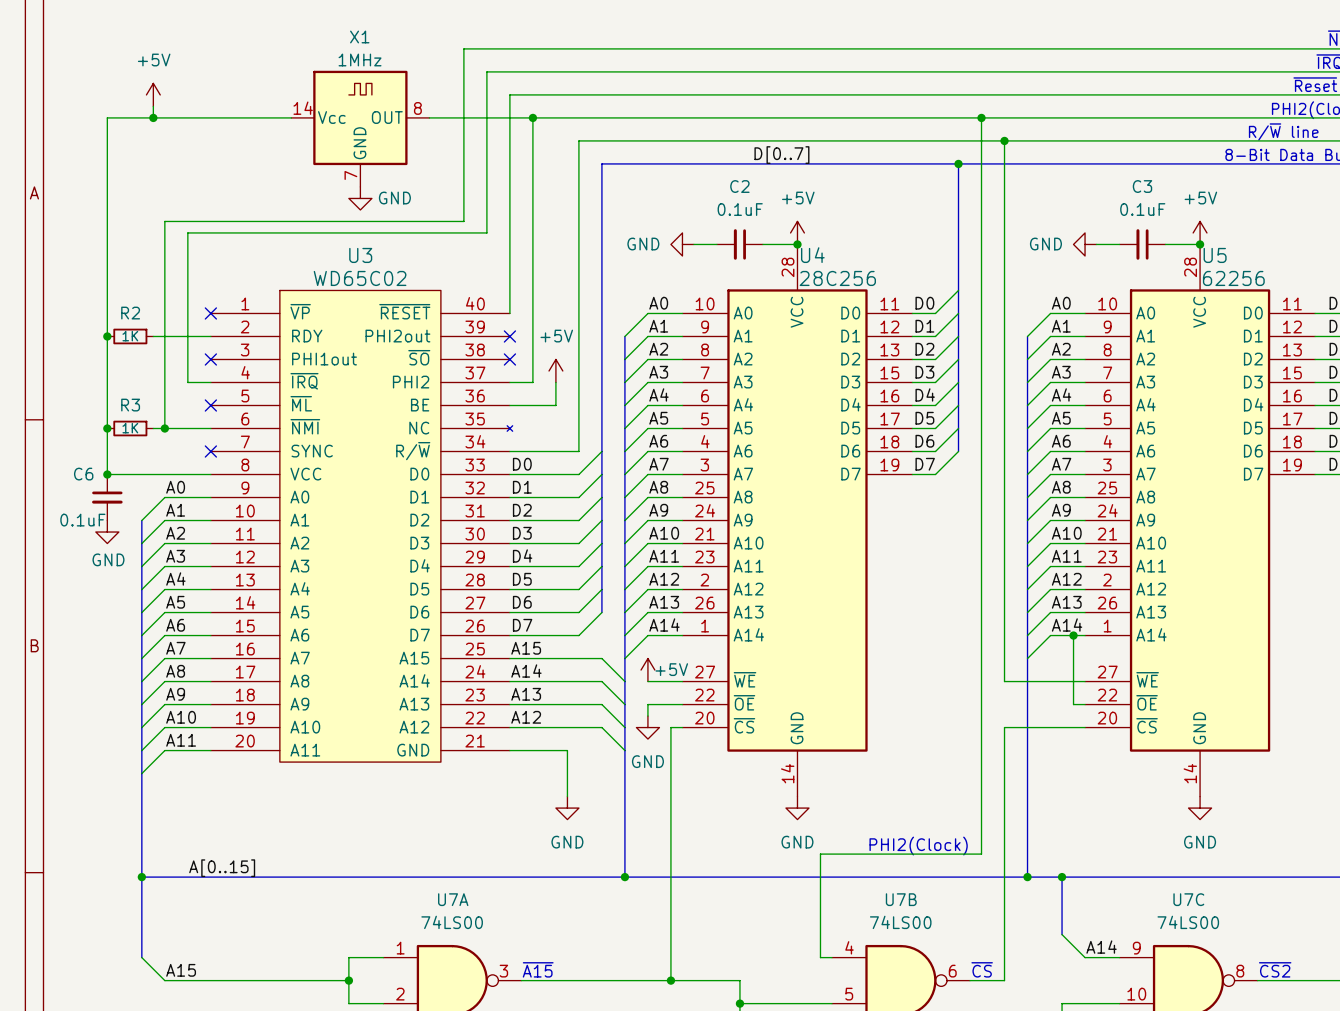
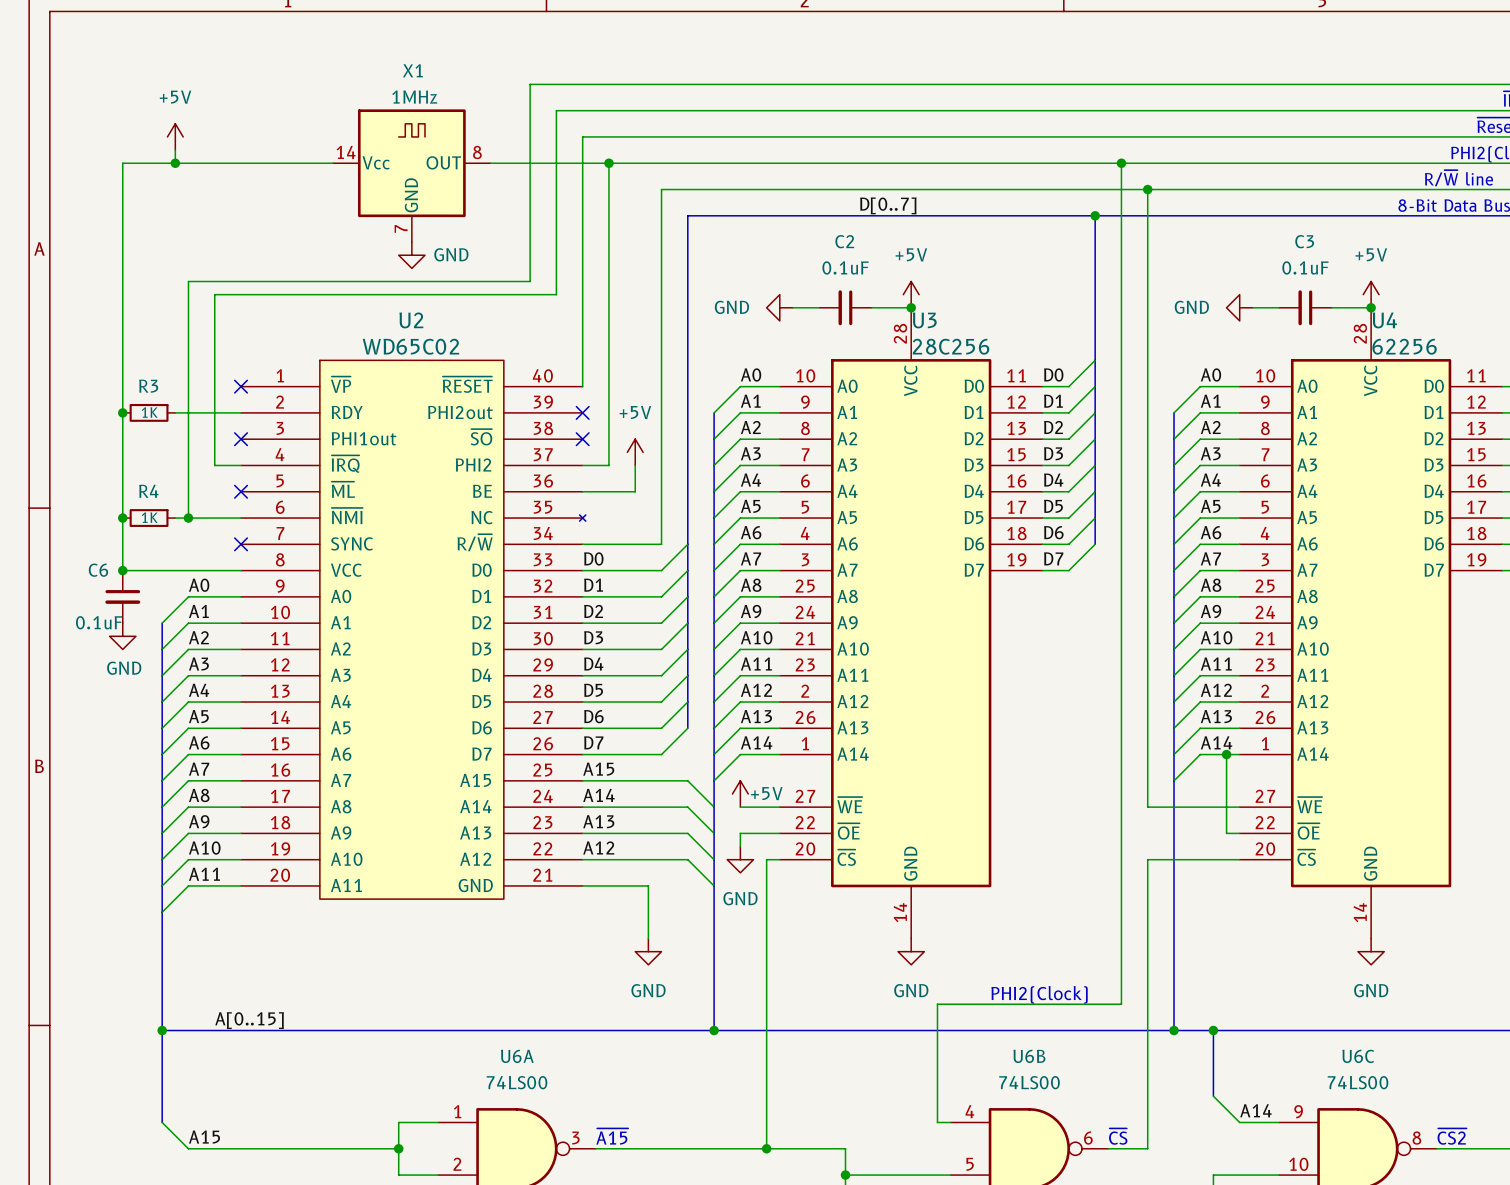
U3 name: U3 (360, 255) -> U2 (411, 320)
U4 name: U4 (812, 255) -> U3 (924, 320)
U5 name: U5 (1215, 255) -> U4 (1384, 320)
R2 name: R2 (130, 313) -> R3 (148, 386)
R3 name: R3 (130, 405) -> R4 (148, 491)
U7A name: U7A (453, 899) -> U6A (517, 1056)
U7B name: U7B (901, 899) -> U6B (1029, 1056)
U7C name: U7C (1188, 899) -> U6C (1358, 1056)

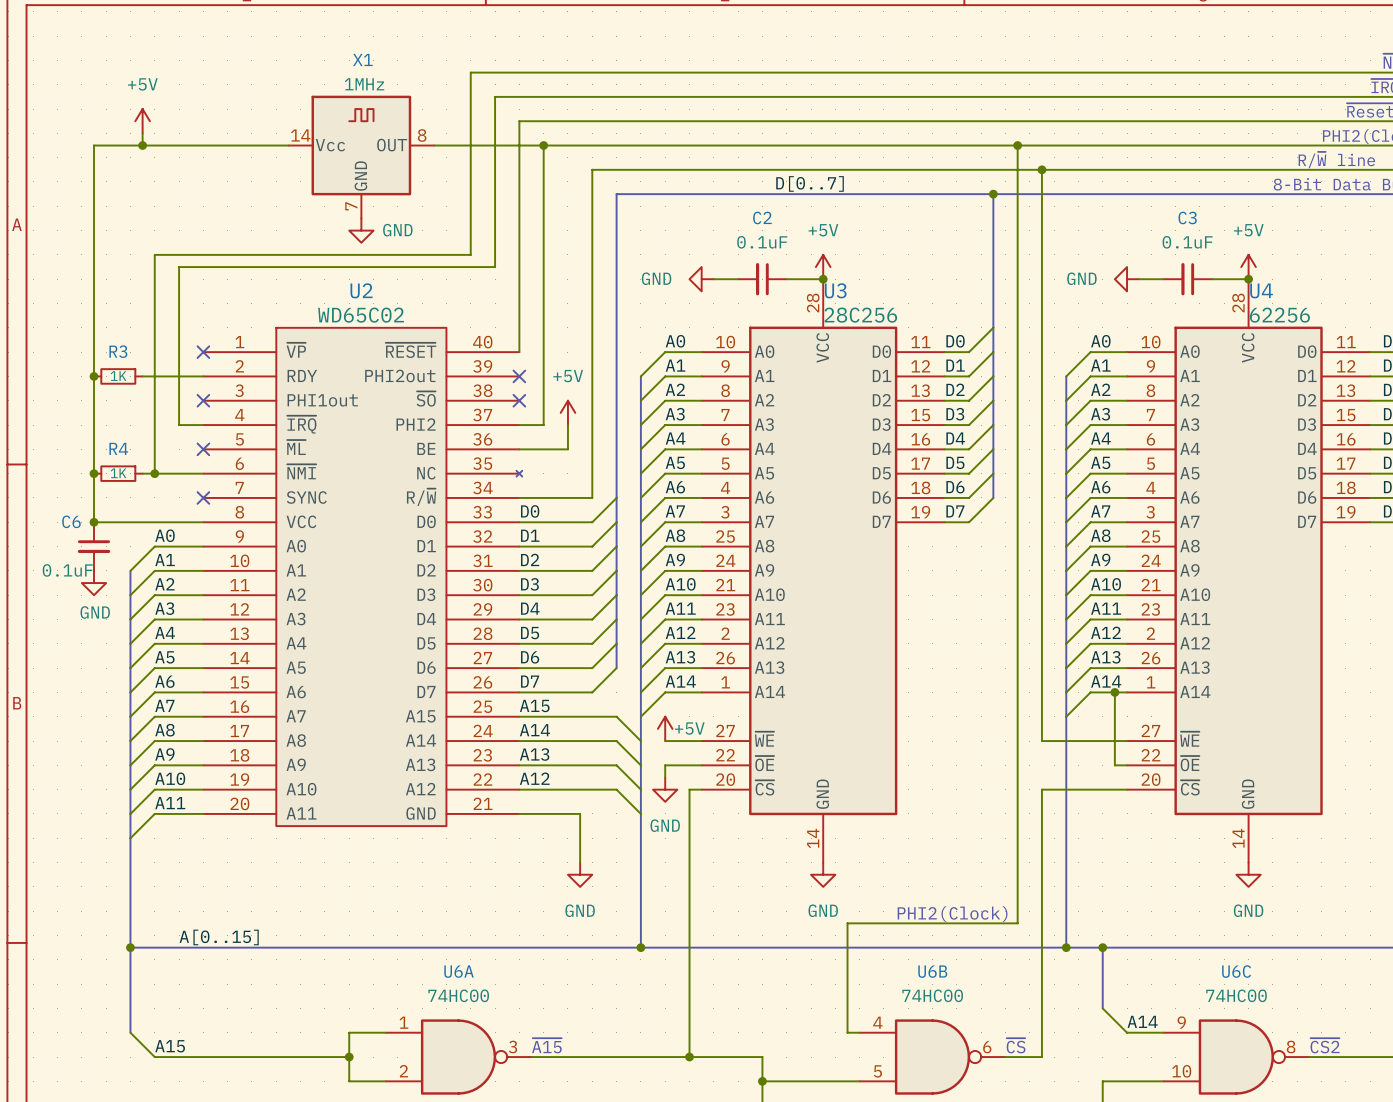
U6A value: 74LS00 (517, 1082) -> 74HC00 (458, 995)
U6B value: 74LS00 (1029, 1082) -> 74HC00 (932, 995)
U6C value: 74LS00 (1358, 1082) -> 74HC00 (1236, 995)

